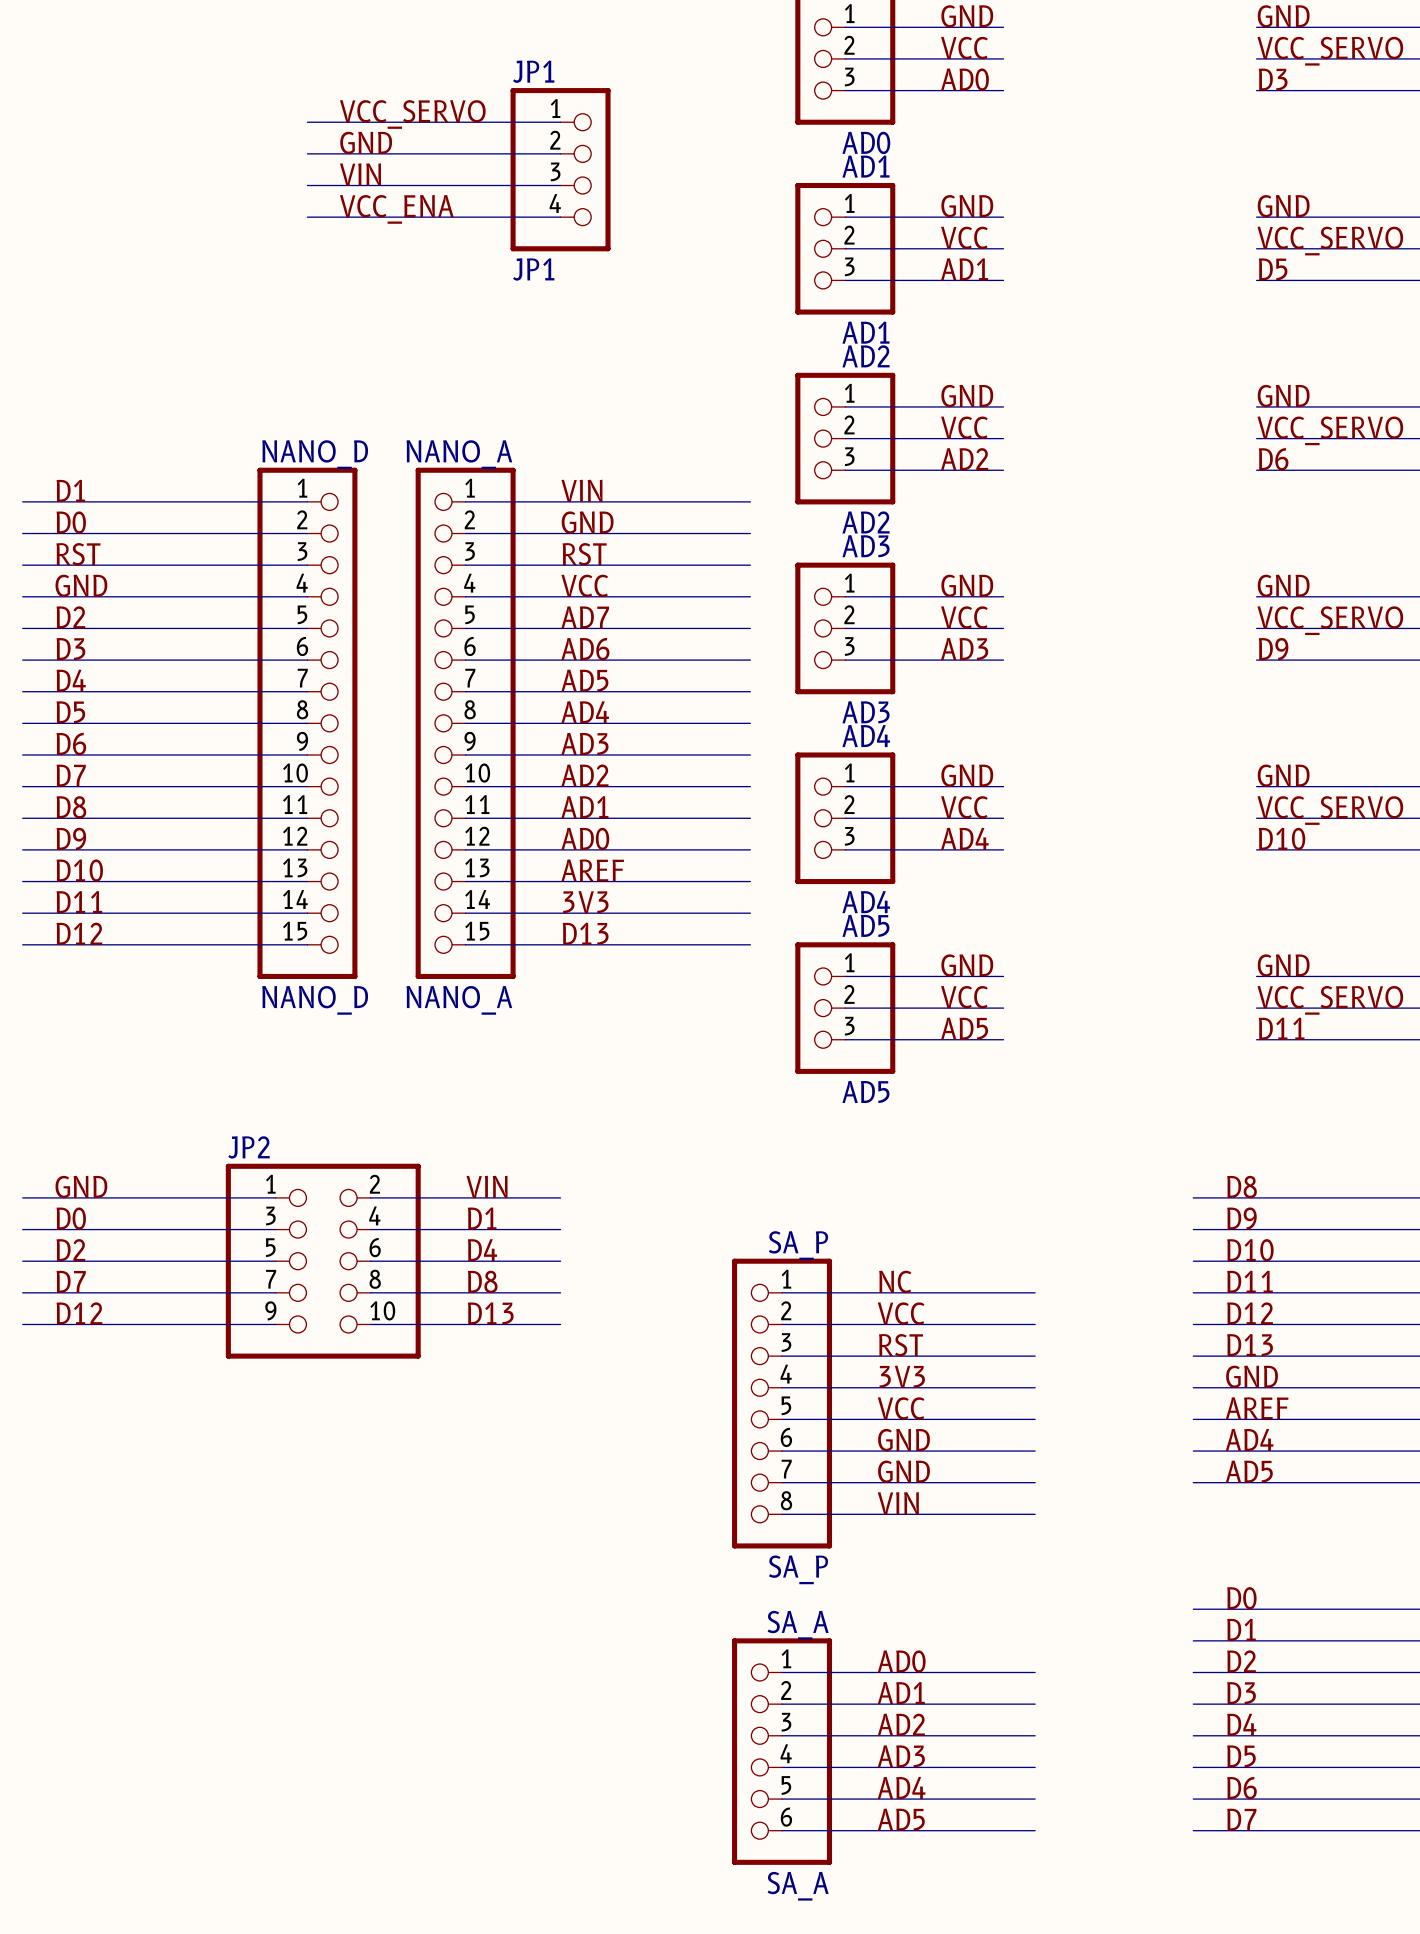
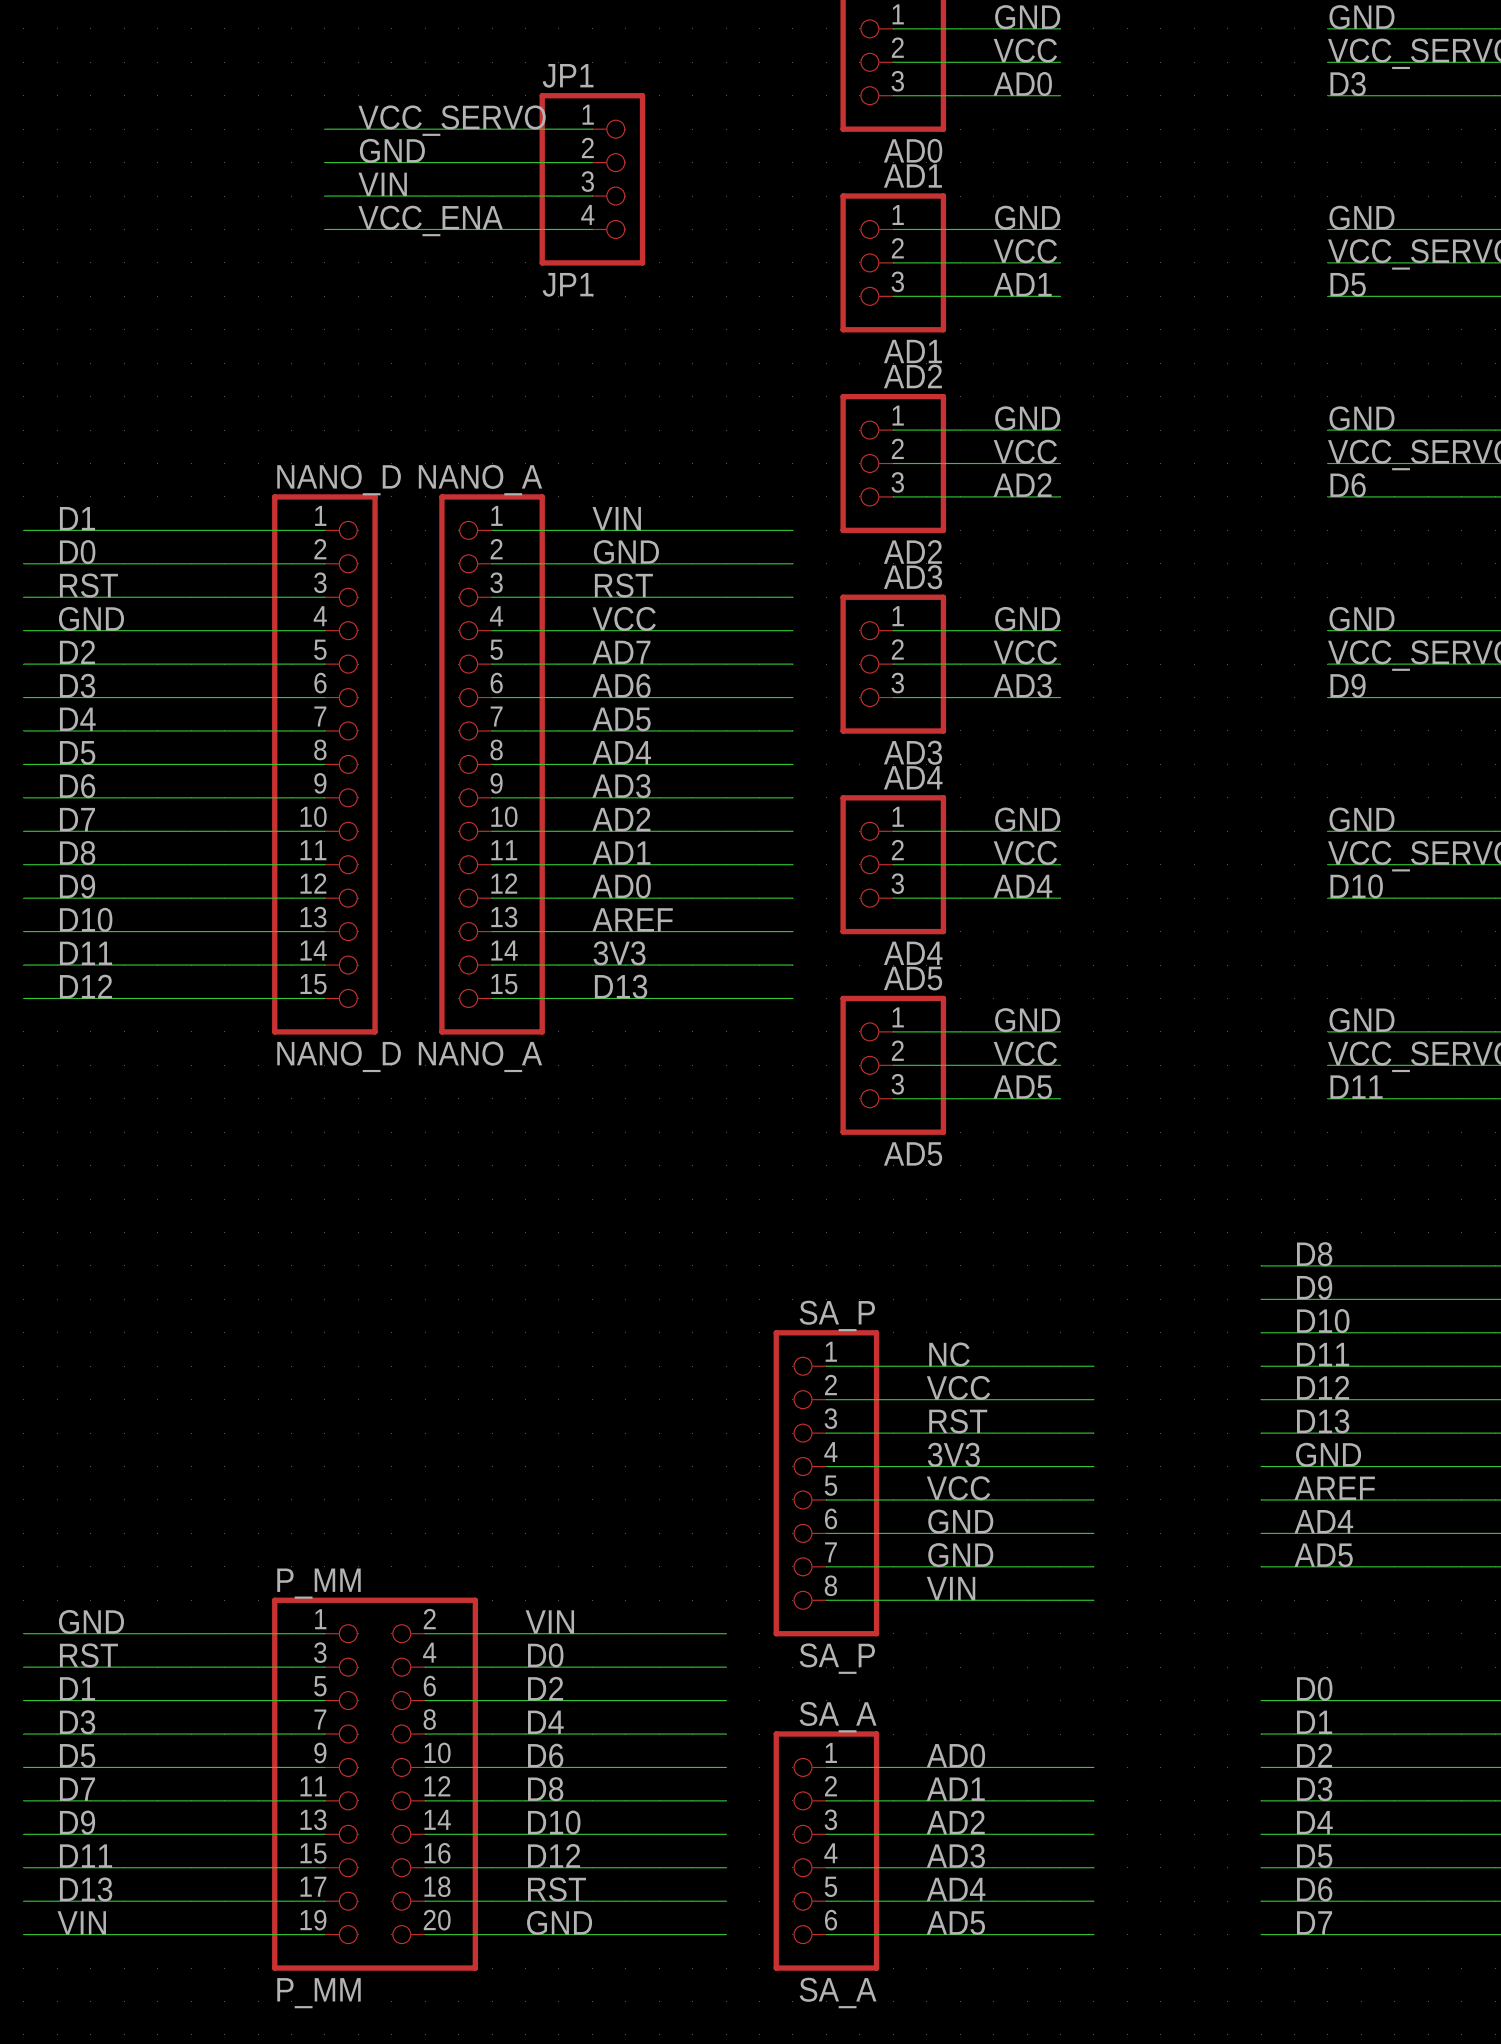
label: GND (81, 1186) -> none
label: VIN (487, 1187) -> none
wire: (22, 1197) (275, 1197) -> none
wire: (370, 1197) (560, 1197) -> none
label: D0 (71, 1218) -> none
label: D1 (482, 1218) -> none
wire: (22, 1229) (275, 1229) -> none
wire: (370, 1229) (560, 1229) -> none
label: D2 (70, 1250) -> none
label: D4 (482, 1250) -> none
wire: (22, 1261) (275, 1261) -> none
JP2: (323, 1261) -> none
wire: (370, 1261) (560, 1261) -> none
label: D7 (71, 1281) -> none
label: D8 (482, 1281) -> none
wire: (22, 1292) (275, 1292) -> none
wire: (370, 1292) (560, 1292) -> none
label: D12 (79, 1313) -> none
label: D13 (490, 1313) -> none
wire: (22, 1324) (275, 1324) -> none
wire: (370, 1324) (560, 1324) -> none
label: none -> GND (91, 1622)
label: none -> VIN (549, 1622)
wire: none -> (23, 1633) (324, 1633)
wire: none -> (425, 1633) (726, 1633)
label: none -> RST (88, 1655)
label: none -> D0 (545, 1655)
wire: none -> (23, 1667) (324, 1667)
wire: none -> (425, 1667) (726, 1667)
label: none -> D1 (77, 1688)
label: none -> D2 (545, 1688)
wire: none -> (23, 1700) (324, 1700)
wire: none -> (425, 1700) (726, 1700)
label: none -> D3 (77, 1722)
label: none -> D4 (545, 1722)
wire: none -> (23, 1734) (324, 1734)
wire: none -> (425, 1734) (726, 1734)
label: none -> D5 (77, 1755)
label: none -> D6 (545, 1755)
wire: none -> (23, 1767) (324, 1767)
wire: none -> (425, 1767) (726, 1767)
P_MM: none -> P_MM (375, 1784)
label: none -> D7 (77, 1789)
label: none -> D8 (545, 1789)
wire: none -> (23, 1800) (324, 1800)
wire: none -> (425, 1800) (726, 1800)
label: none -> D9 (77, 1822)
label: none -> D10 (554, 1822)
wire: none -> (23, 1834) (324, 1834)
wire: none -> (425, 1834) (726, 1834)
label: none -> D11 (86, 1856)
label: none -> D12 (554, 1855)
wire: none -> (23, 1867) (324, 1867)
wire: none -> (425, 1867) (726, 1867)
label: none -> D13 (86, 1889)
label: none -> RST (557, 1889)
wire: none -> (23, 1901) (324, 1901)
wire: none -> (425, 1901) (726, 1901)
label: none -> VIN (81, 1922)
label: none -> GND (559, 1922)
wire: none -> (23, 1934) (324, 1934)
wire: none -> (425, 1934) (726, 1934)

